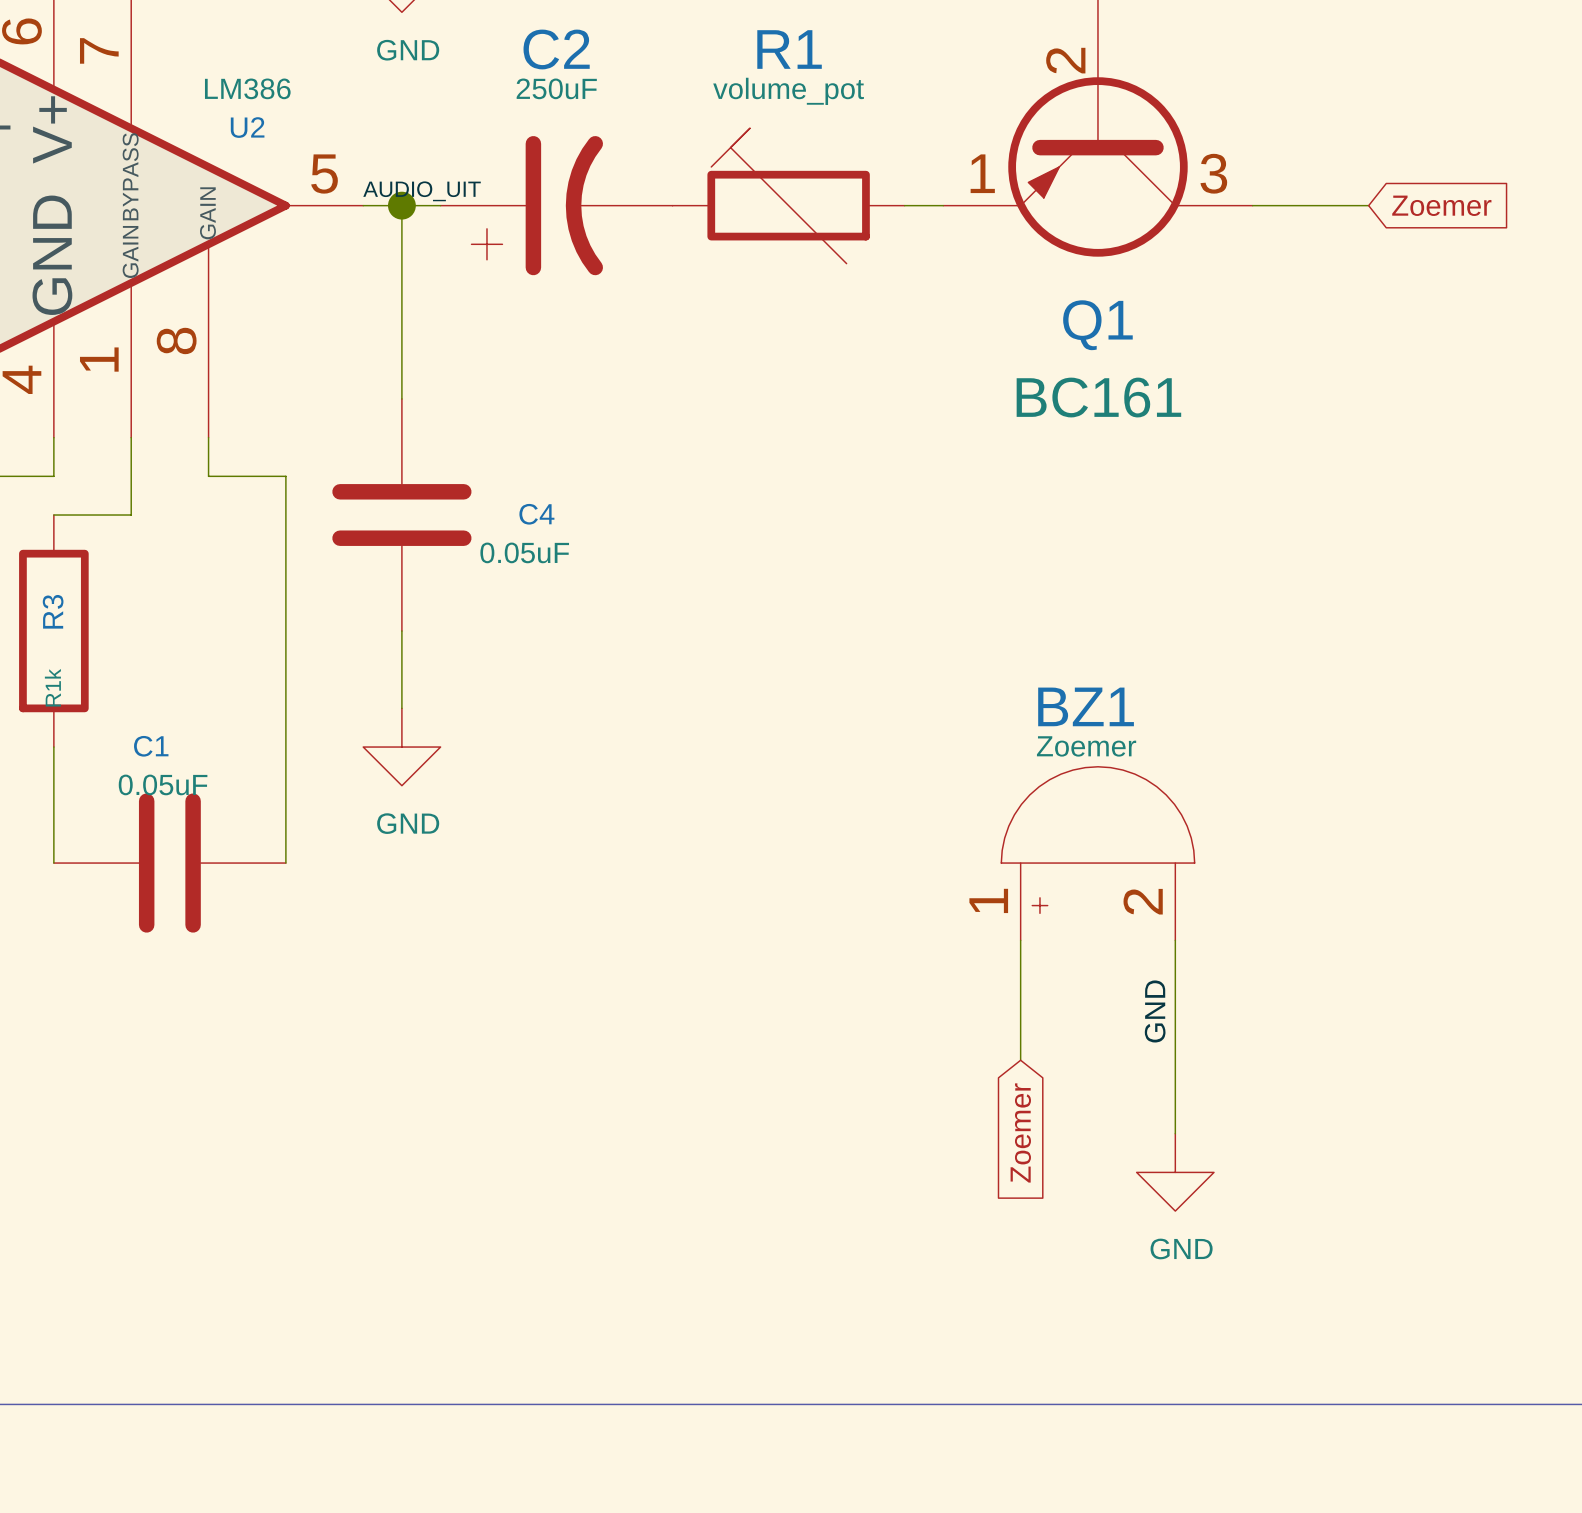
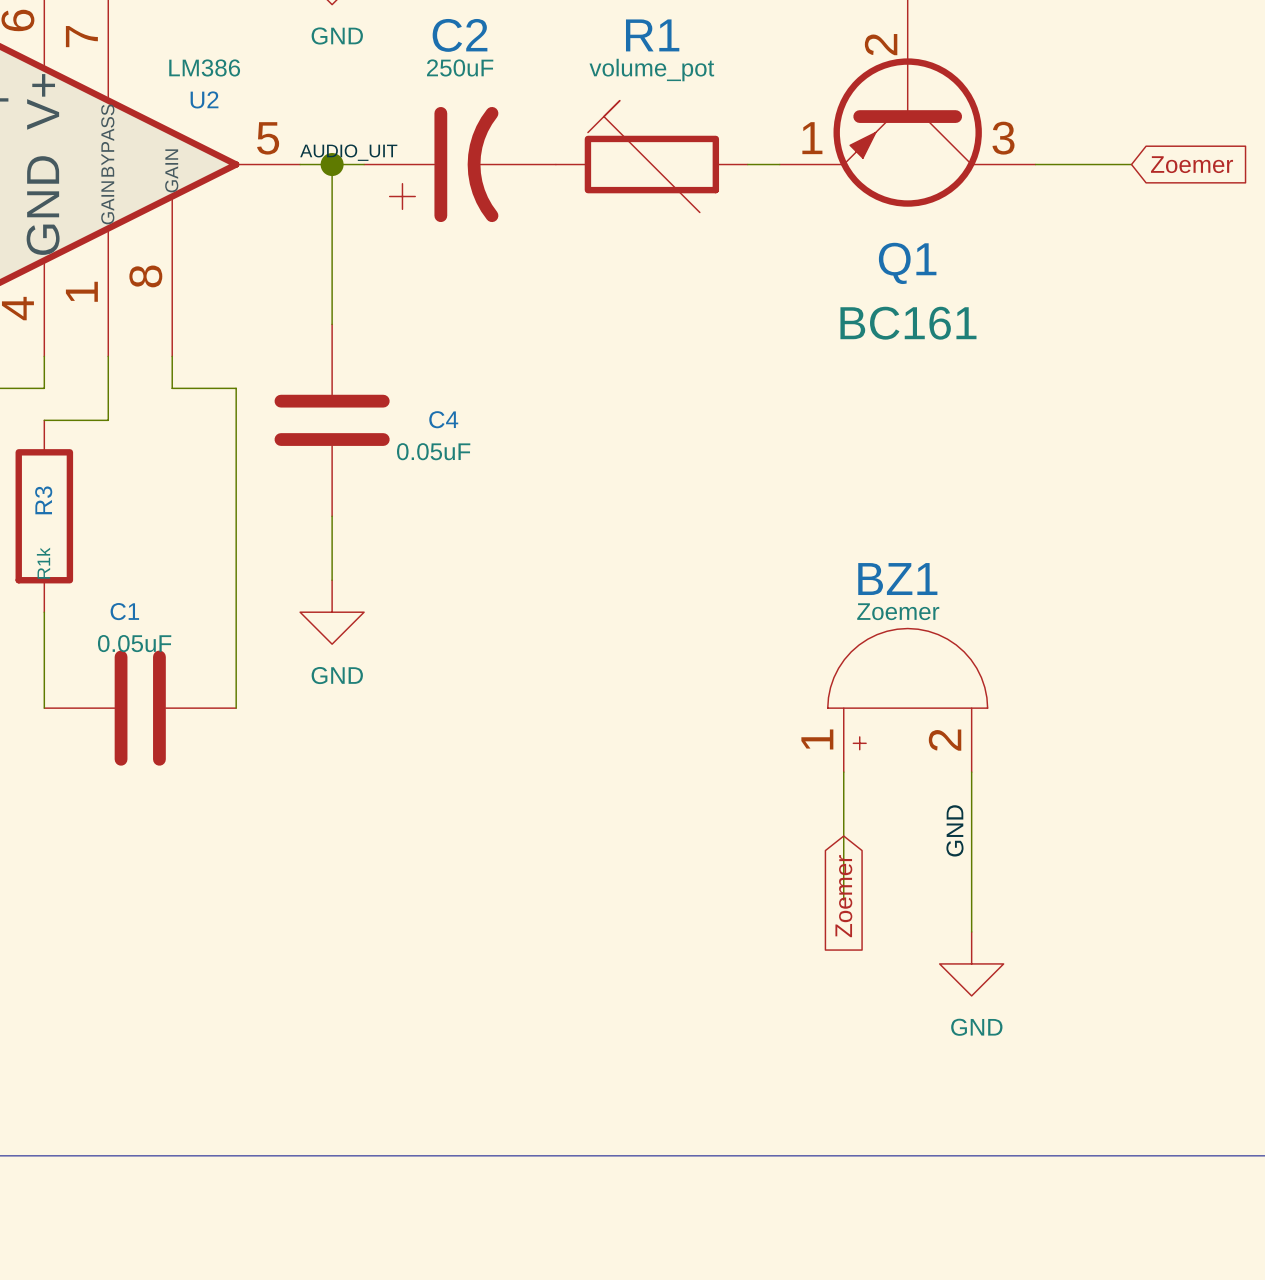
wire: none -> (843, 871) (843, 899)
global label position: Zoemer (1020, 1132) -> Zoemer (843, 896)

